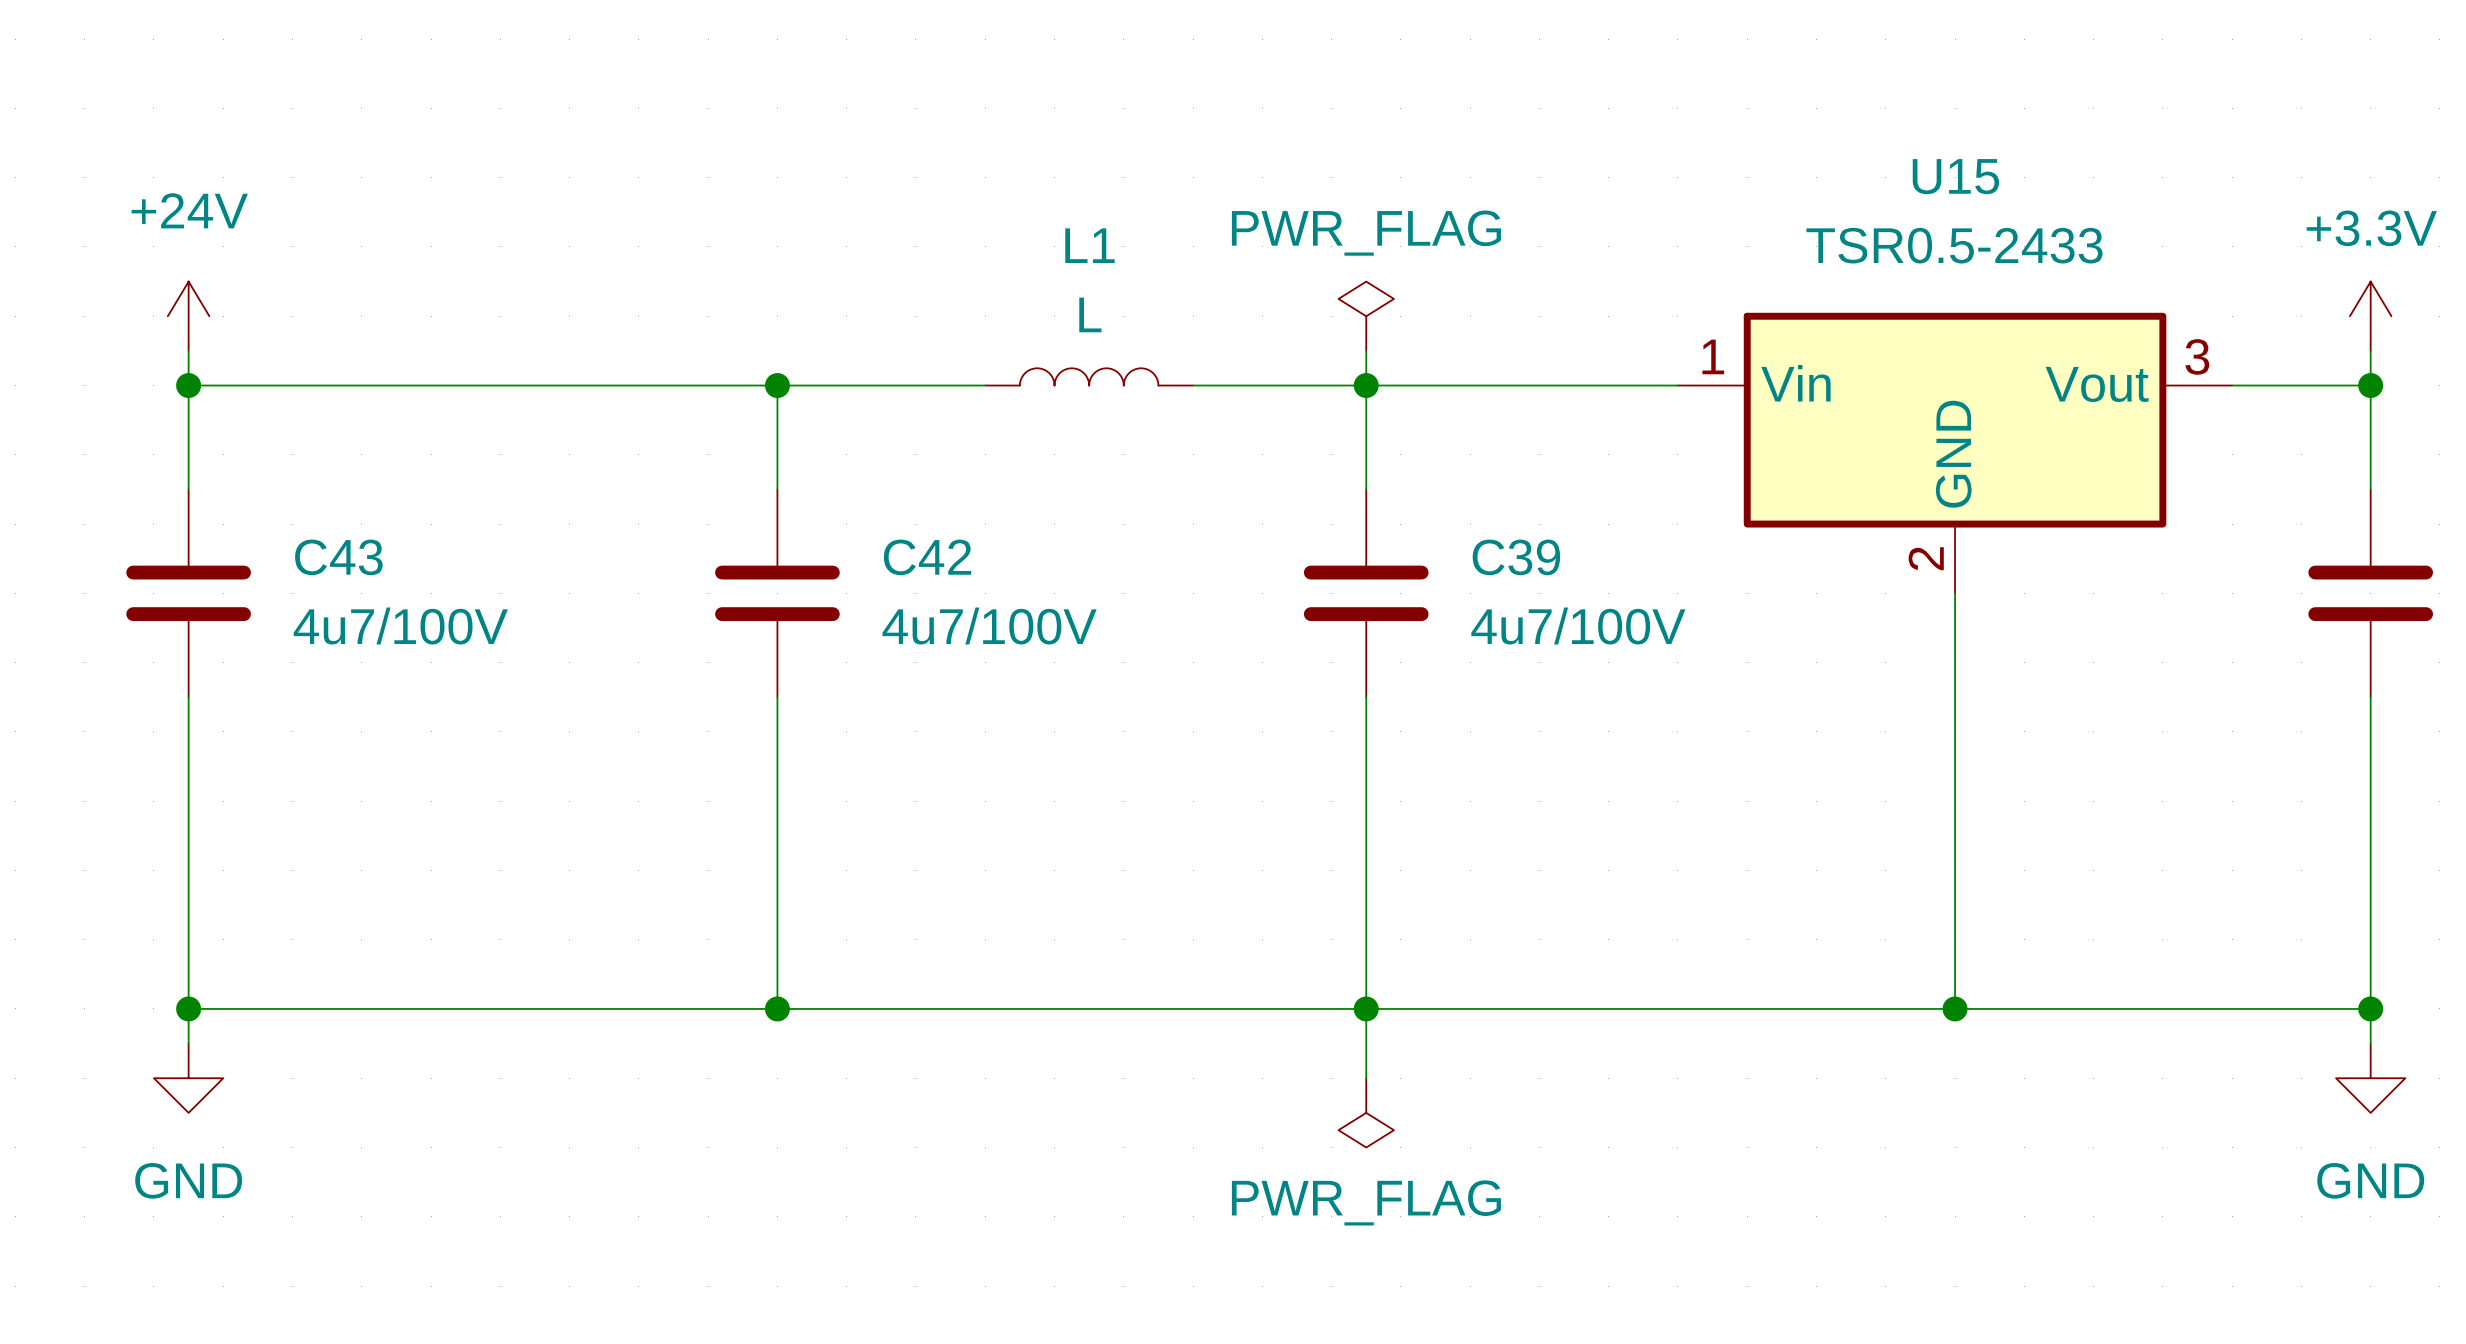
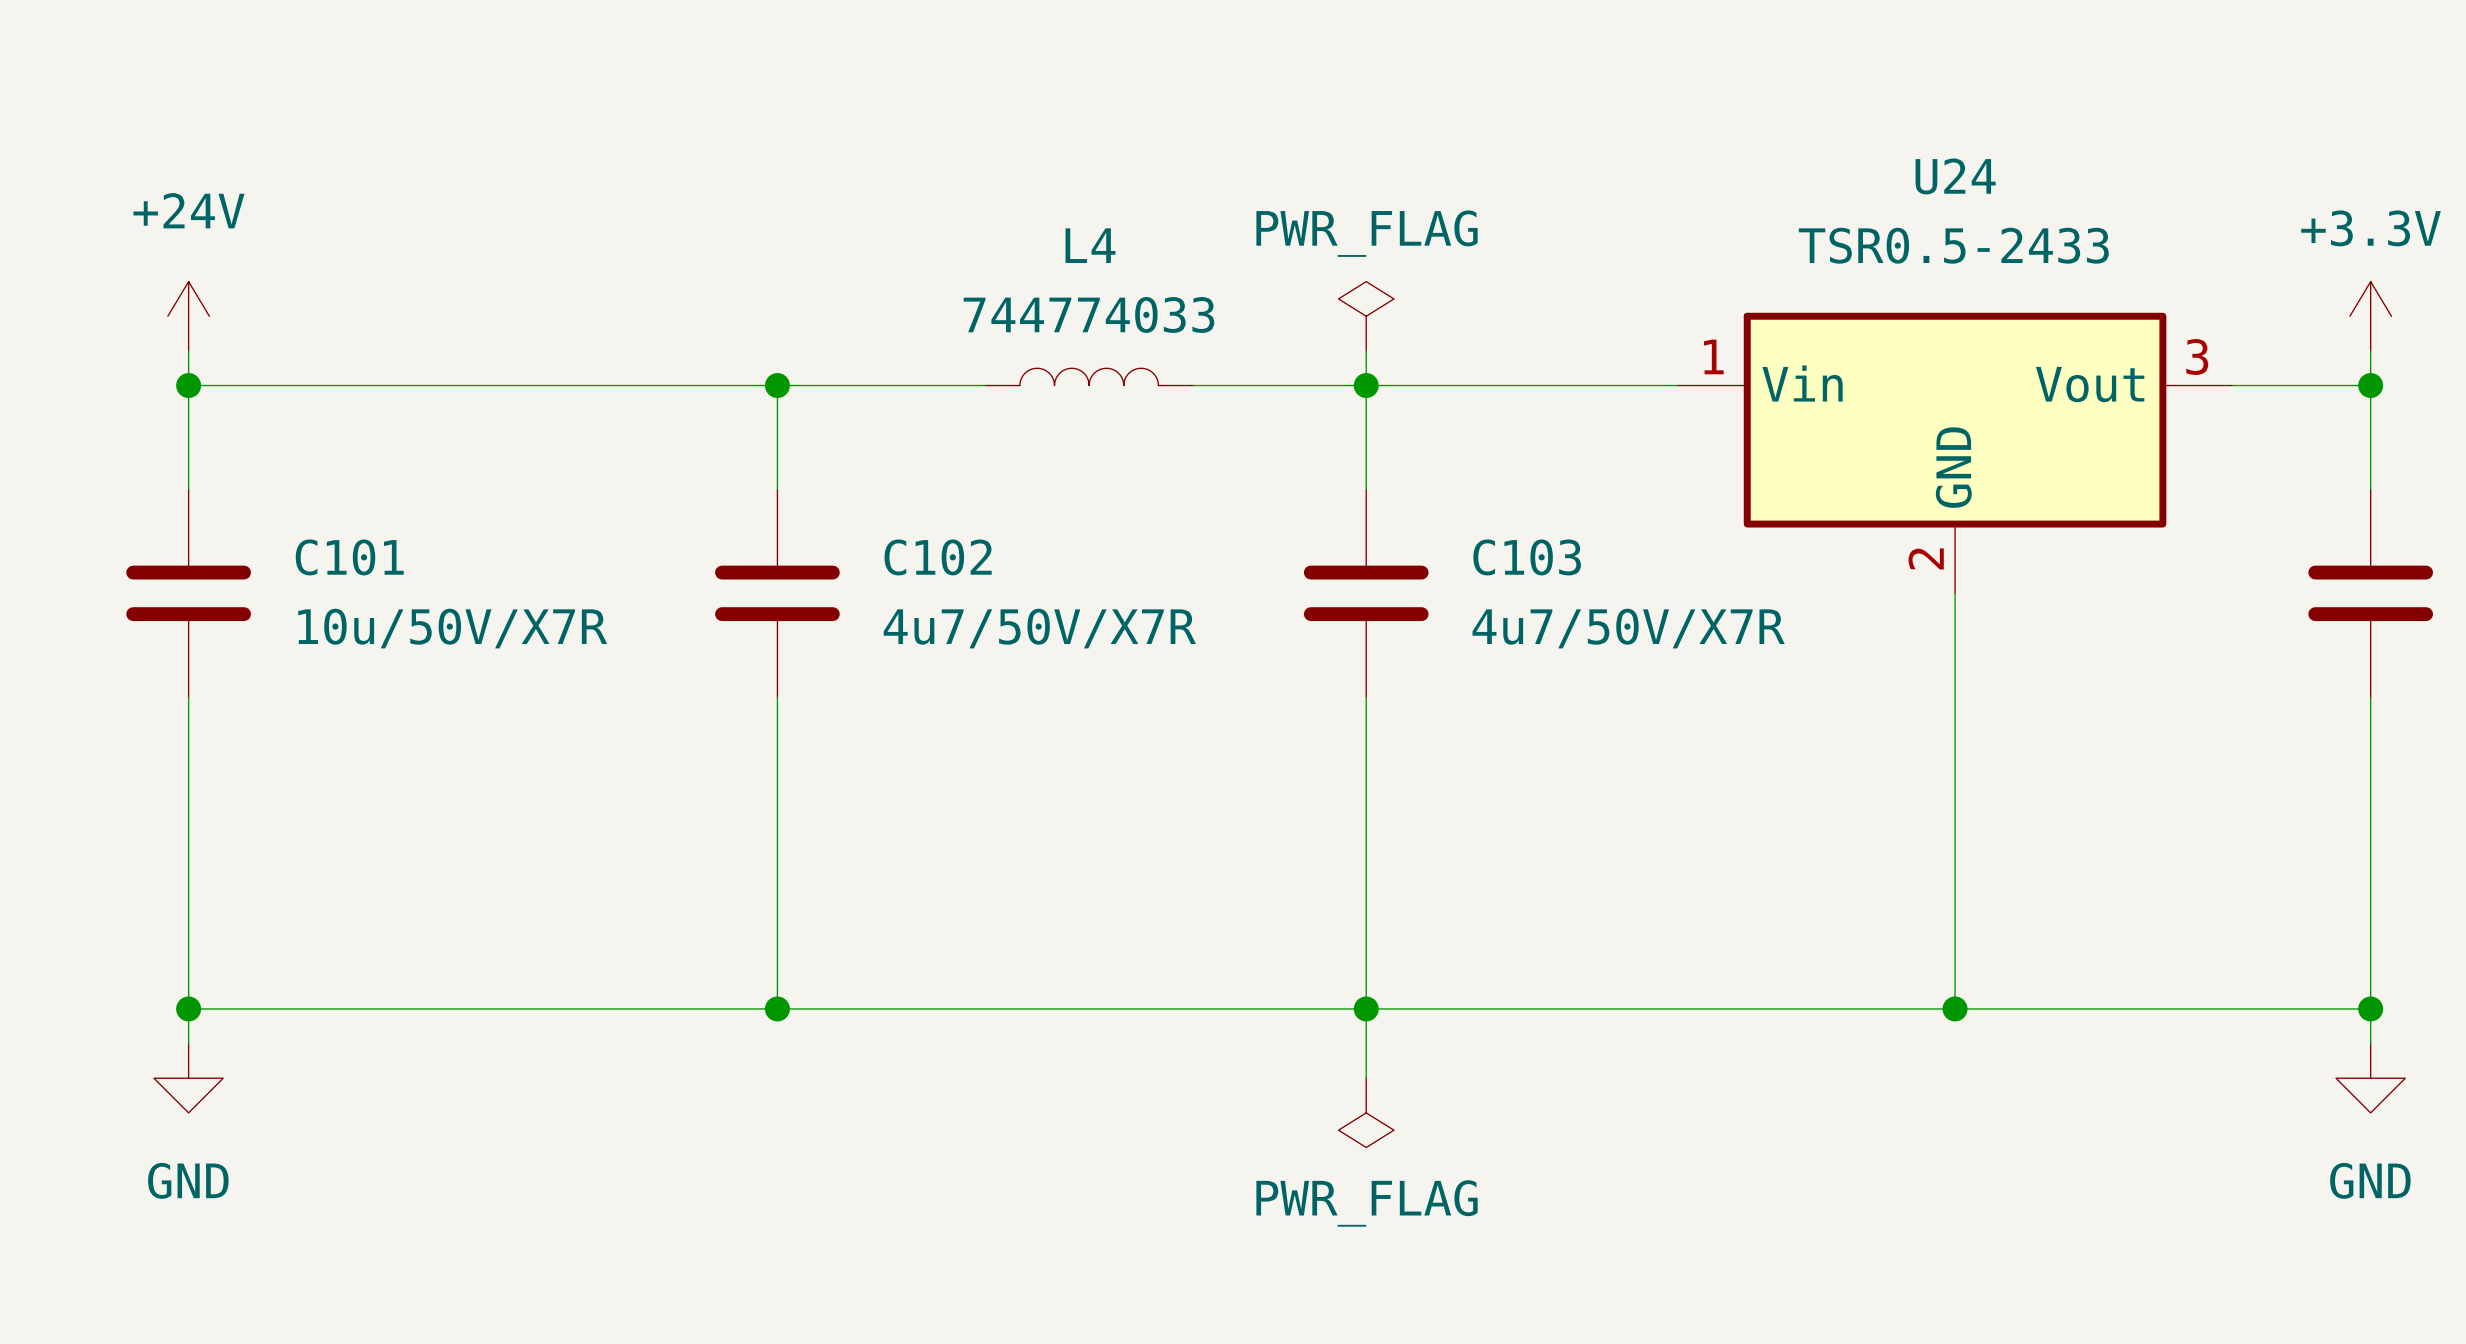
U15 name: U15 (1955, 176) -> U24 (1955, 176)
L1 name: L1 (1089, 245) -> L4 (1090, 245)
L1 value: L (1090, 314) -> 744774033 (1088, 314)
C43 name: C43 (338, 557) -> C101 (349, 557)
C42 name: C42 (927, 557) -> C102 (938, 557)
C39 name: C39 (1516, 557) -> C103 (1527, 557)
C43 value: 4u7/100V (400, 626) -> 10u/50V/X7R (452, 628)
C42 value: 4u7/100V (989, 626) -> 4u7/50V/X7R (1039, 628)
C39 value: 4u7/100V (1578, 626) -> 4u7/50V/X7R (1628, 628)

